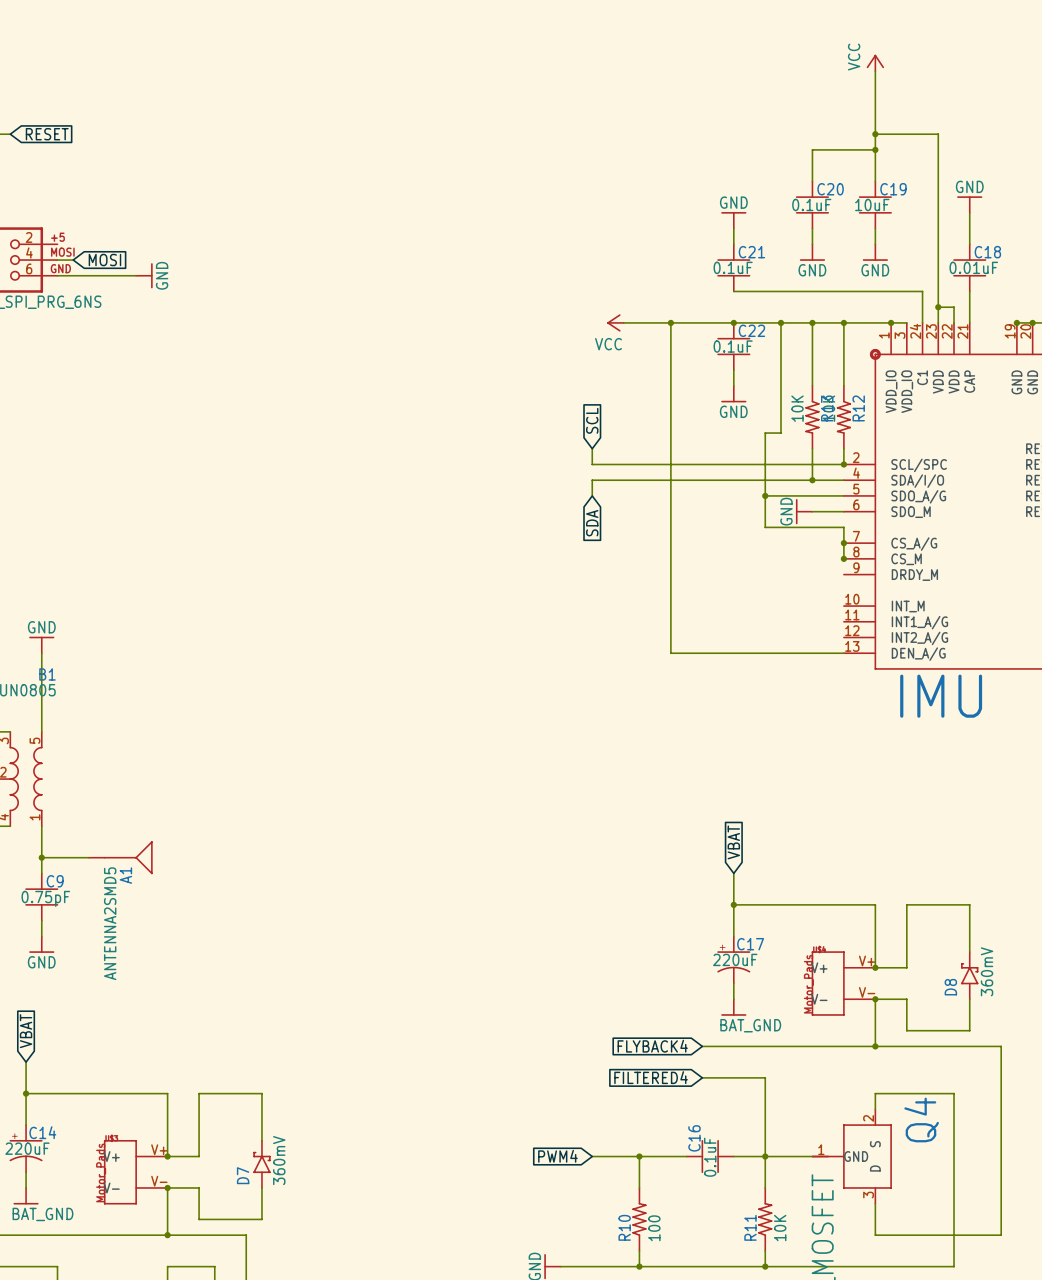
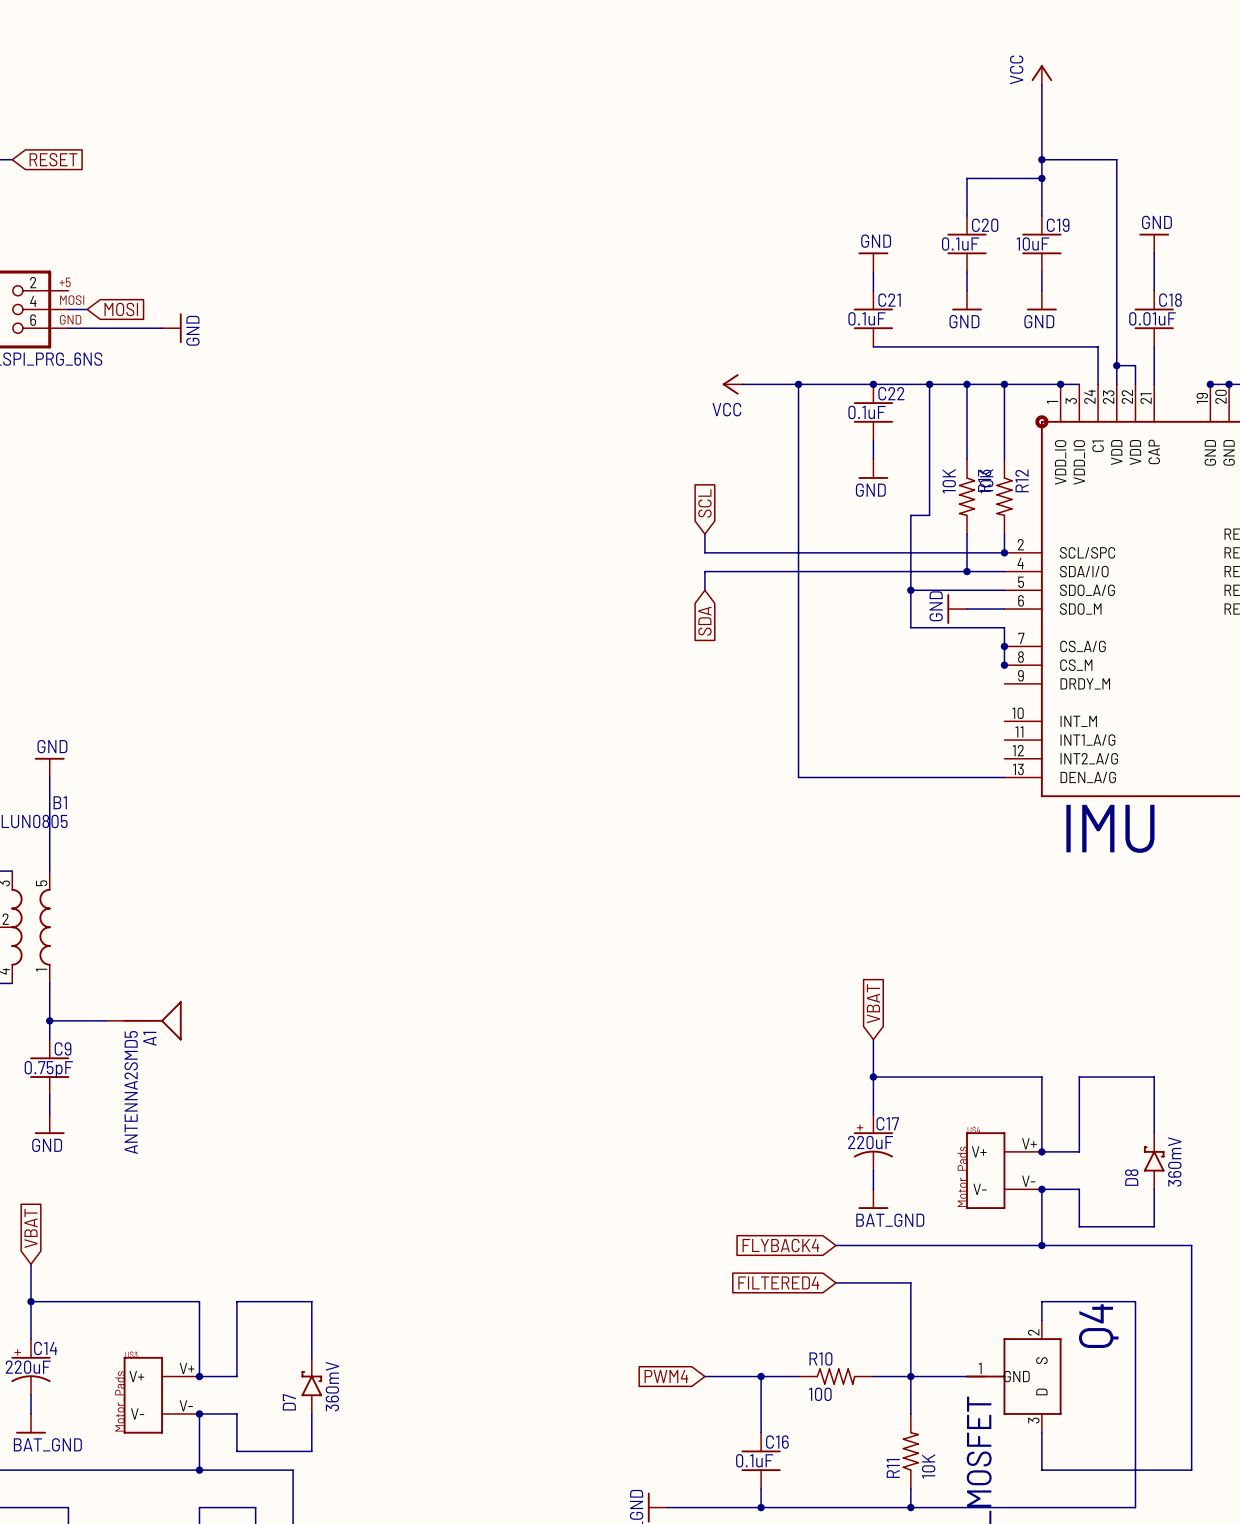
C16 rotation: 0° (710, 1156) -> 90° clockwise (761, 1460)
C16 position: (710, 1156) -> (761, 1460)
R10 rotation: 0° (639, 1219) -> 90° clockwise (835, 1376)
R10 position: (639, 1219) -> (835, 1376)

